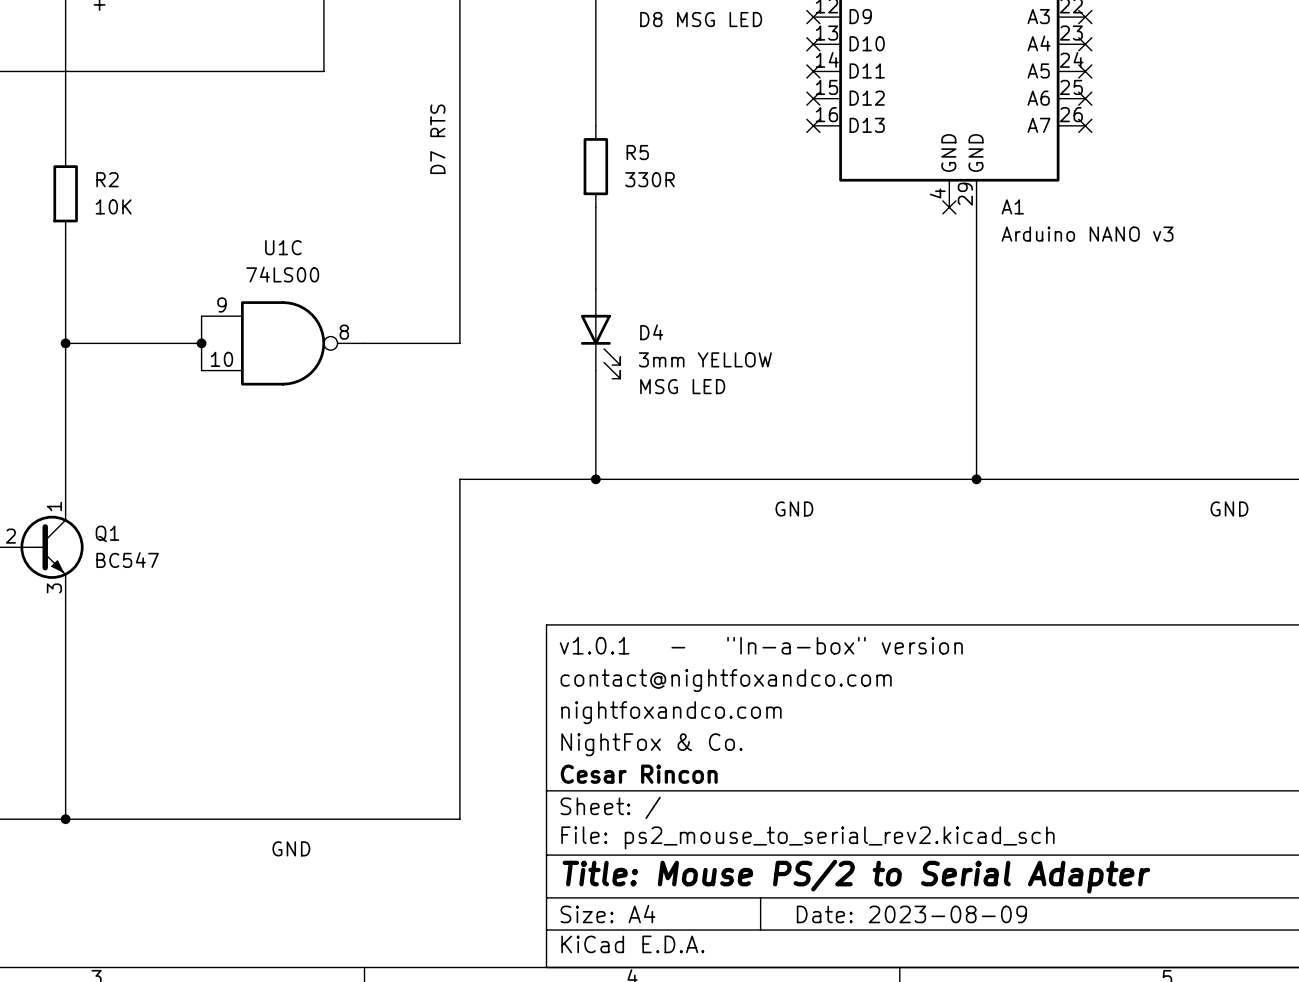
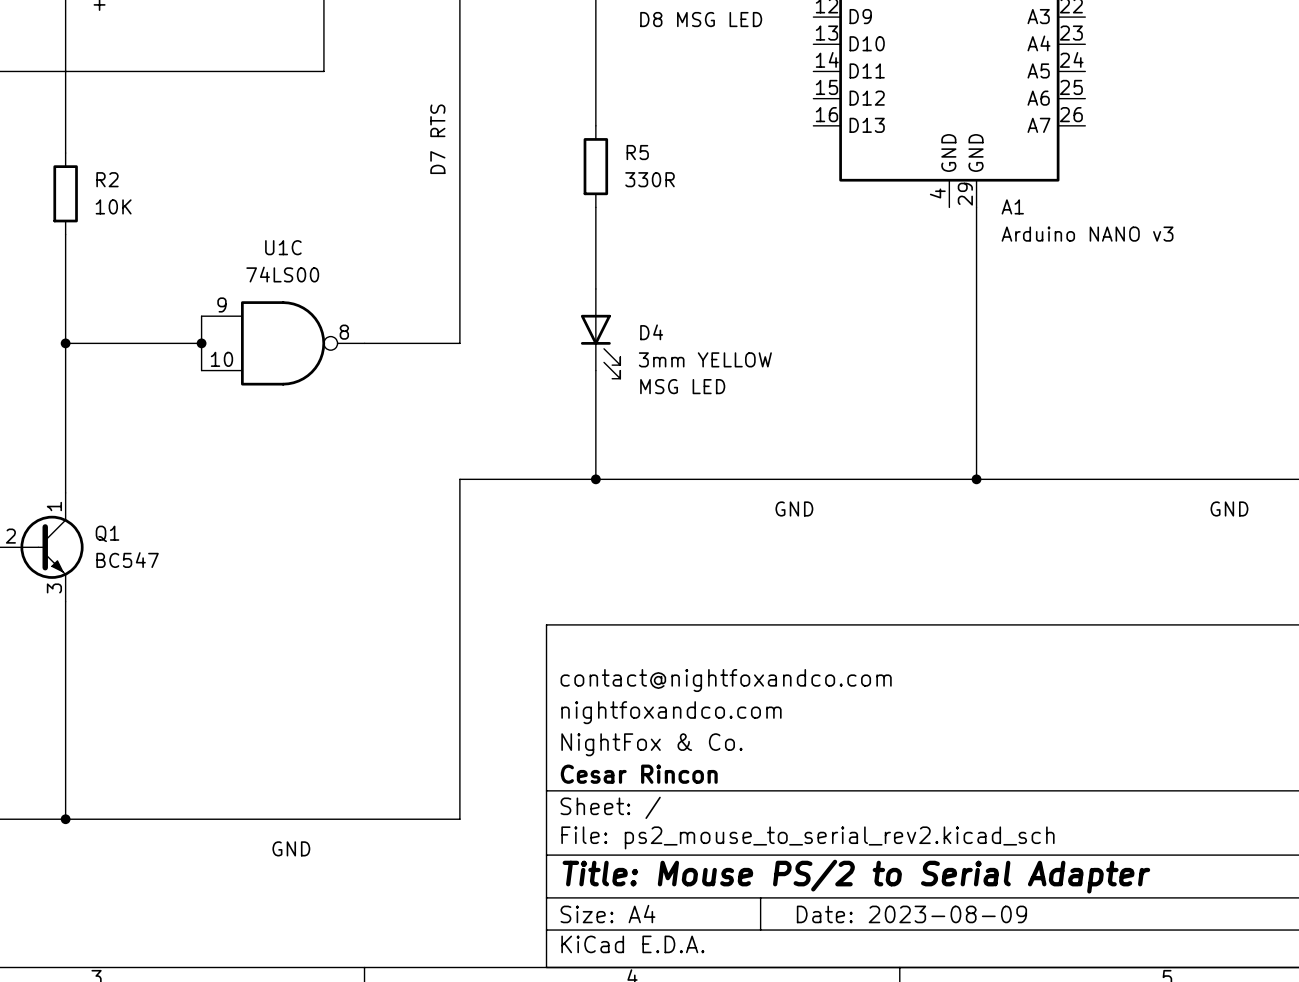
no-connect mark: (813, 17) -> none
no-connect mark: (1085, 17) -> none
no-connect mark: (813, 44) -> none
no-connect mark: (1085, 44) -> none
no-connect mark: (813, 71) -> none
no-connect mark: (1085, 71) -> none
no-connect mark: (813, 98) -> none
no-connect mark: (1085, 98) -> none
no-connect mark: (813, 125) -> none
no-connect mark: (1085, 125) -> none
no-connect mark: (949, 207) -> none
title block: v1.0.1 - "In-a-box" version (761, 645) -> none

